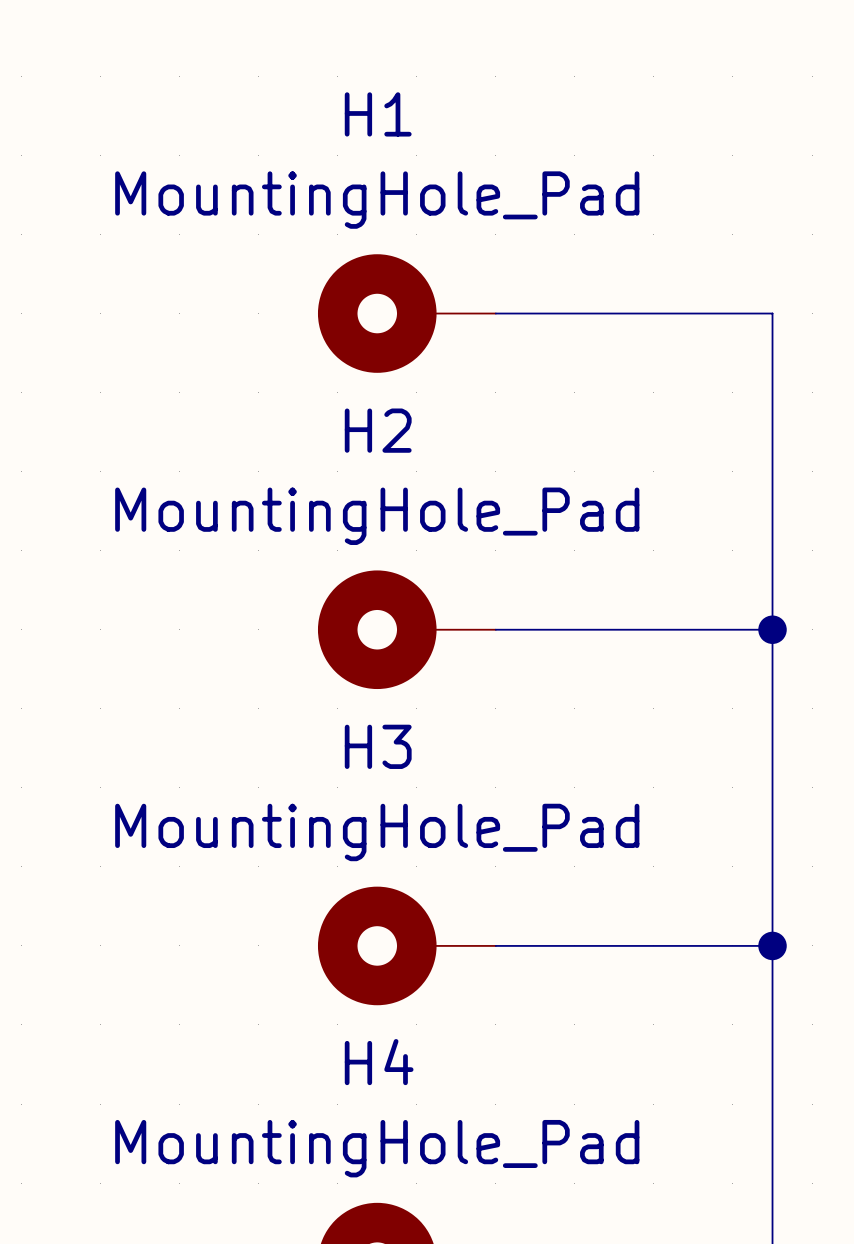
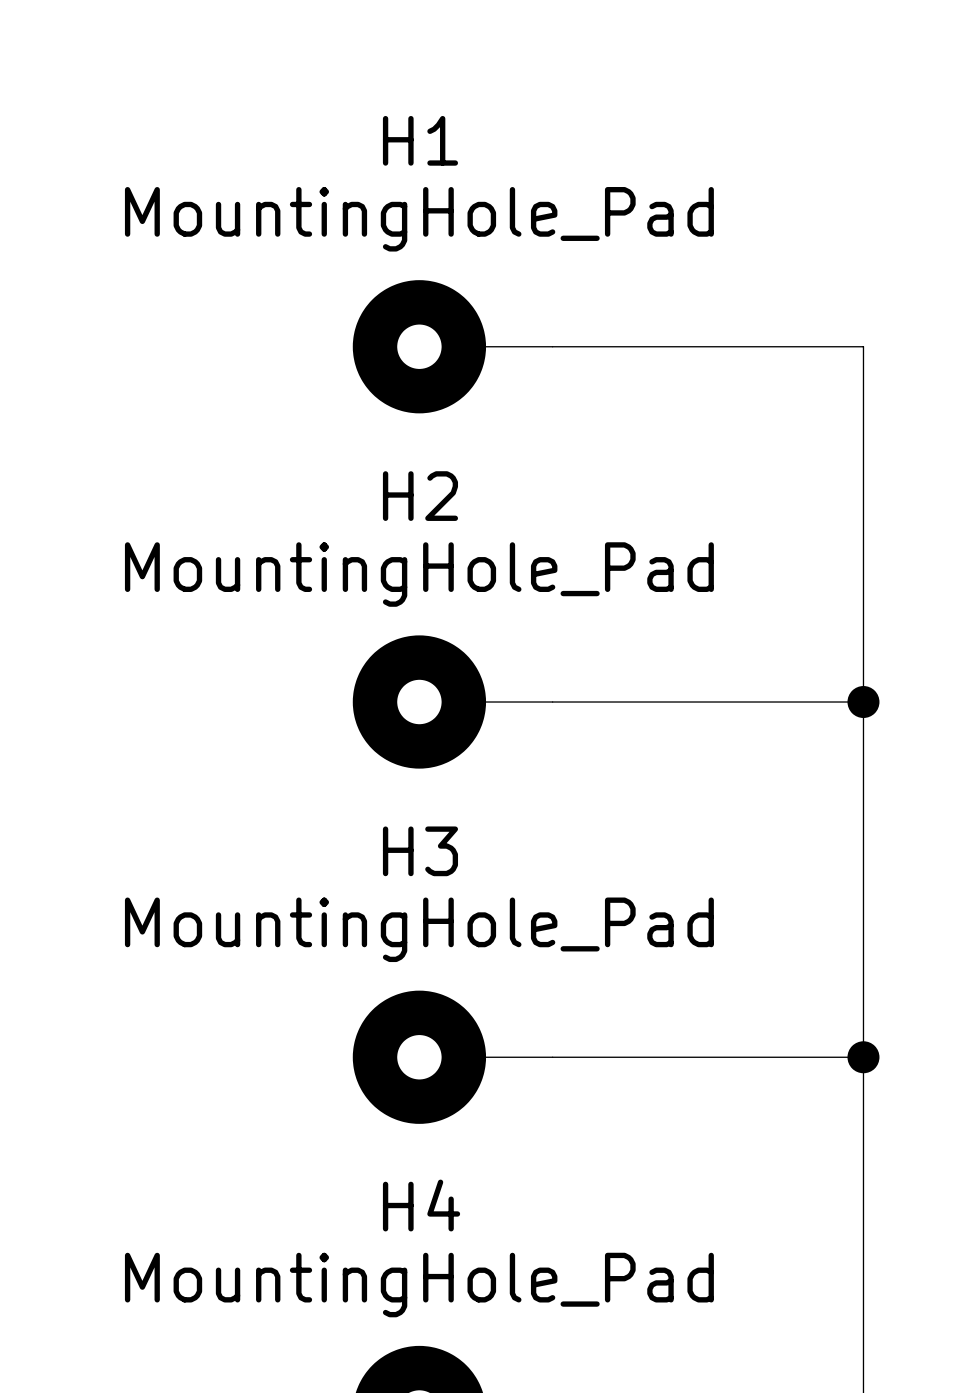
H1 name position: H1 (378, 114) -> H1 (420, 140)
H2 name position: H2 (378, 430) -> H2 (420, 496)
H3 name position: H3 (378, 746) -> H3 (420, 851)
H4 name position: H4 (379, 1062) -> H4 (421, 1205)

